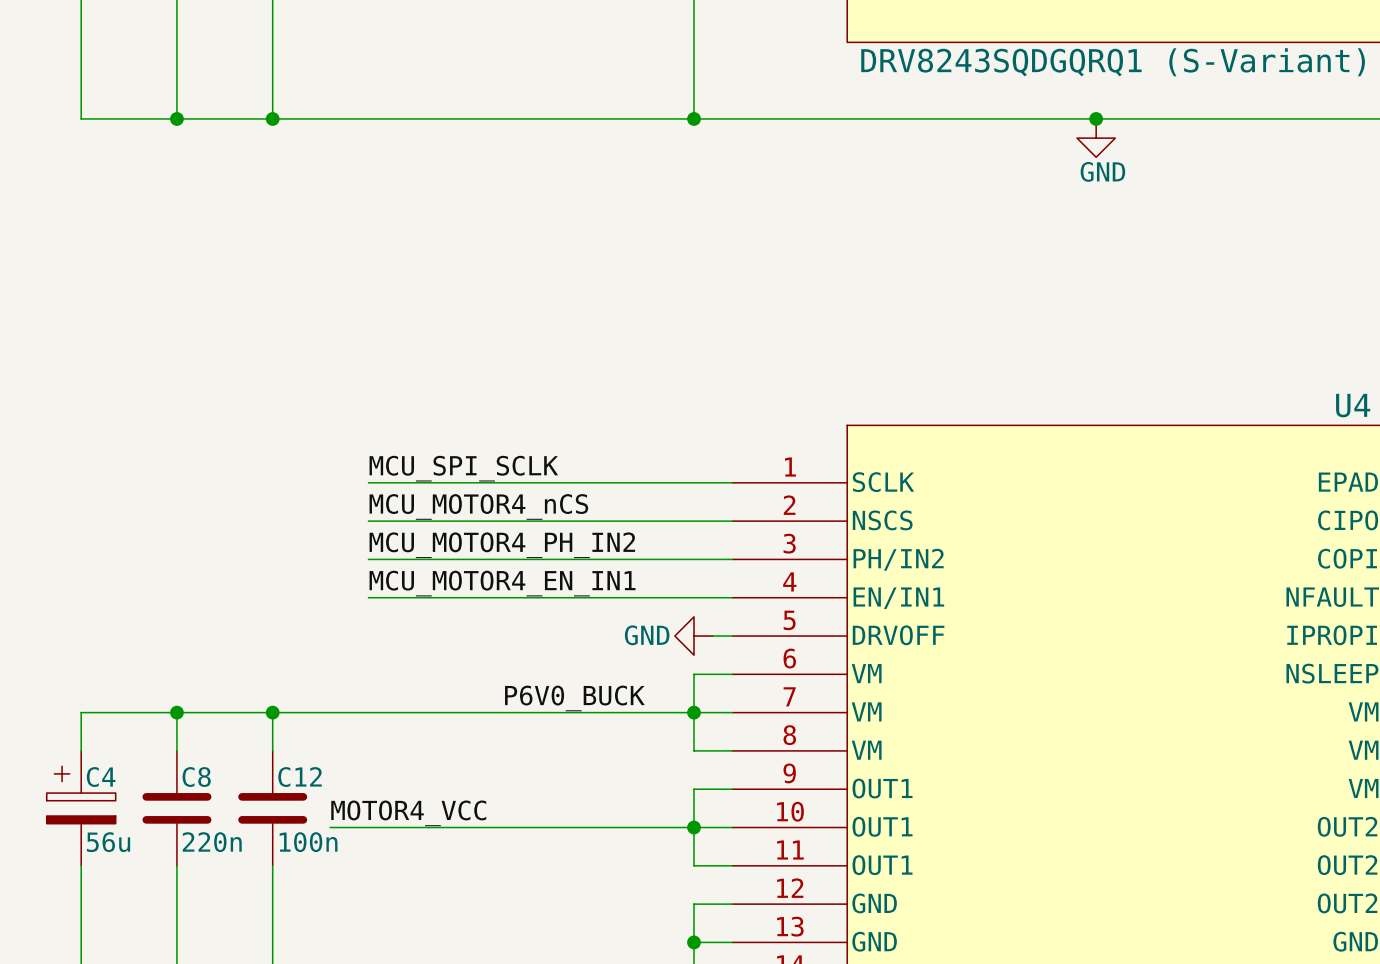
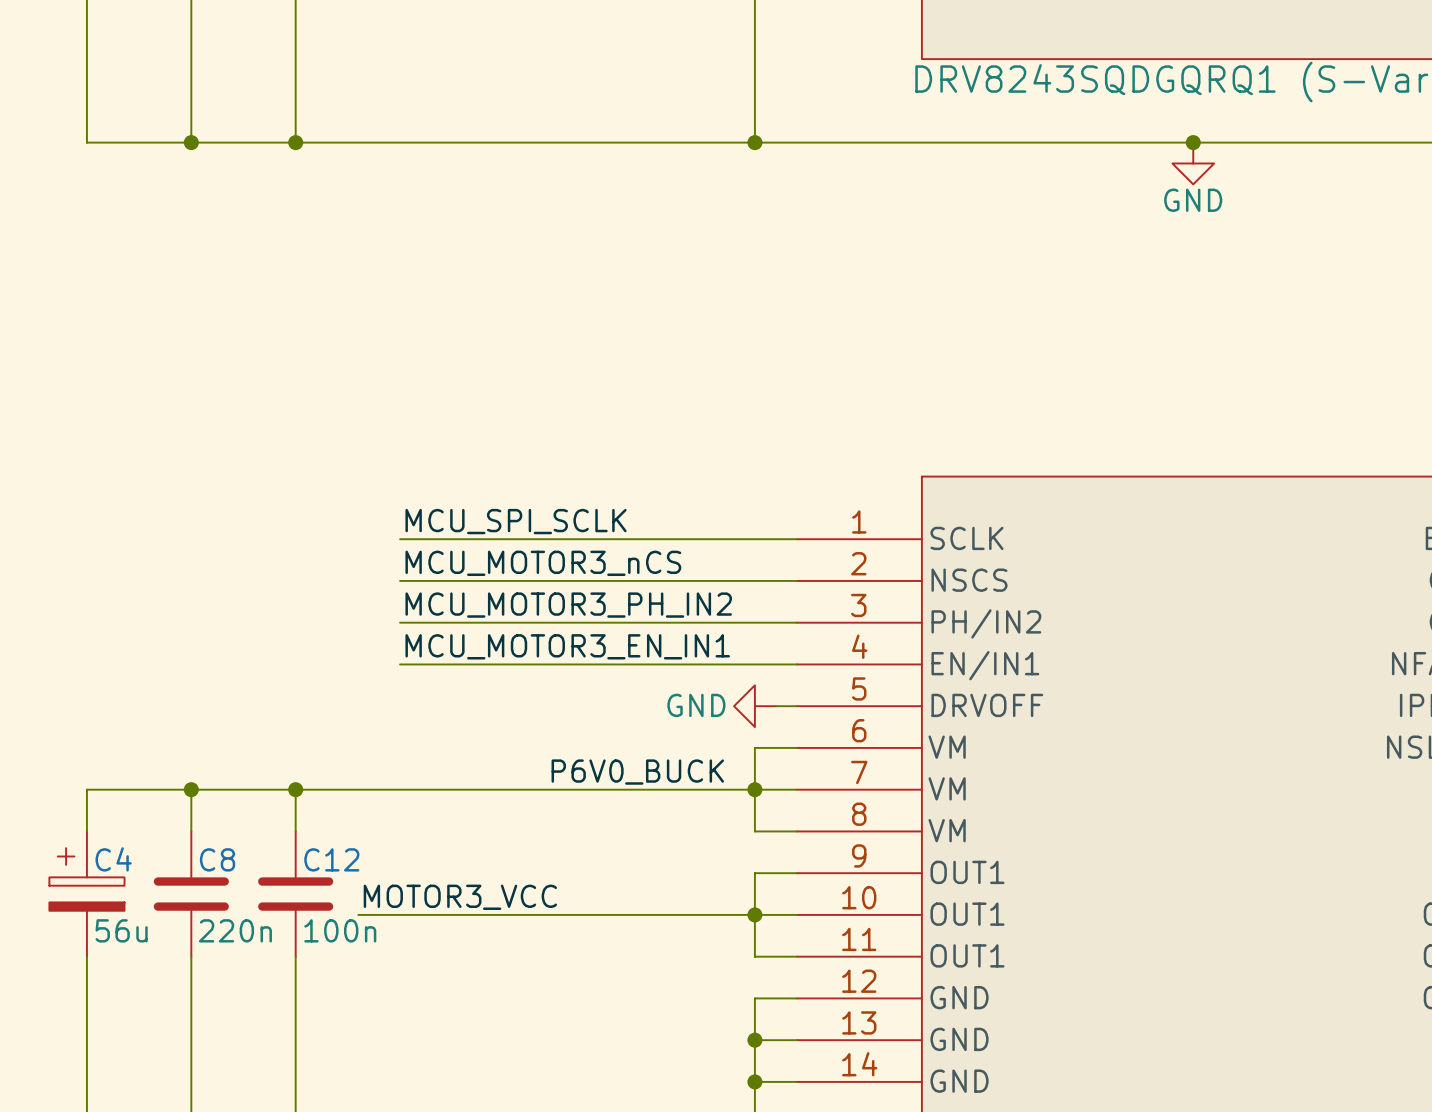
label: MCU_MOTOR4_nCS (478, 506) -> MCU_MOTOR3_nCS (543, 563)
label: MCU_MOTOR4_PH_IN2 (502, 545) -> MCU_MOTOR3_PH_IN2 (568, 605)
label: MCU_MOTOR4_EN_IN1 (502, 583) -> MCU_MOTOR3_EN_IN1 (567, 646)
label: MOTOR4_VCC (408, 813) -> MOTOR3_VCC (460, 897)

